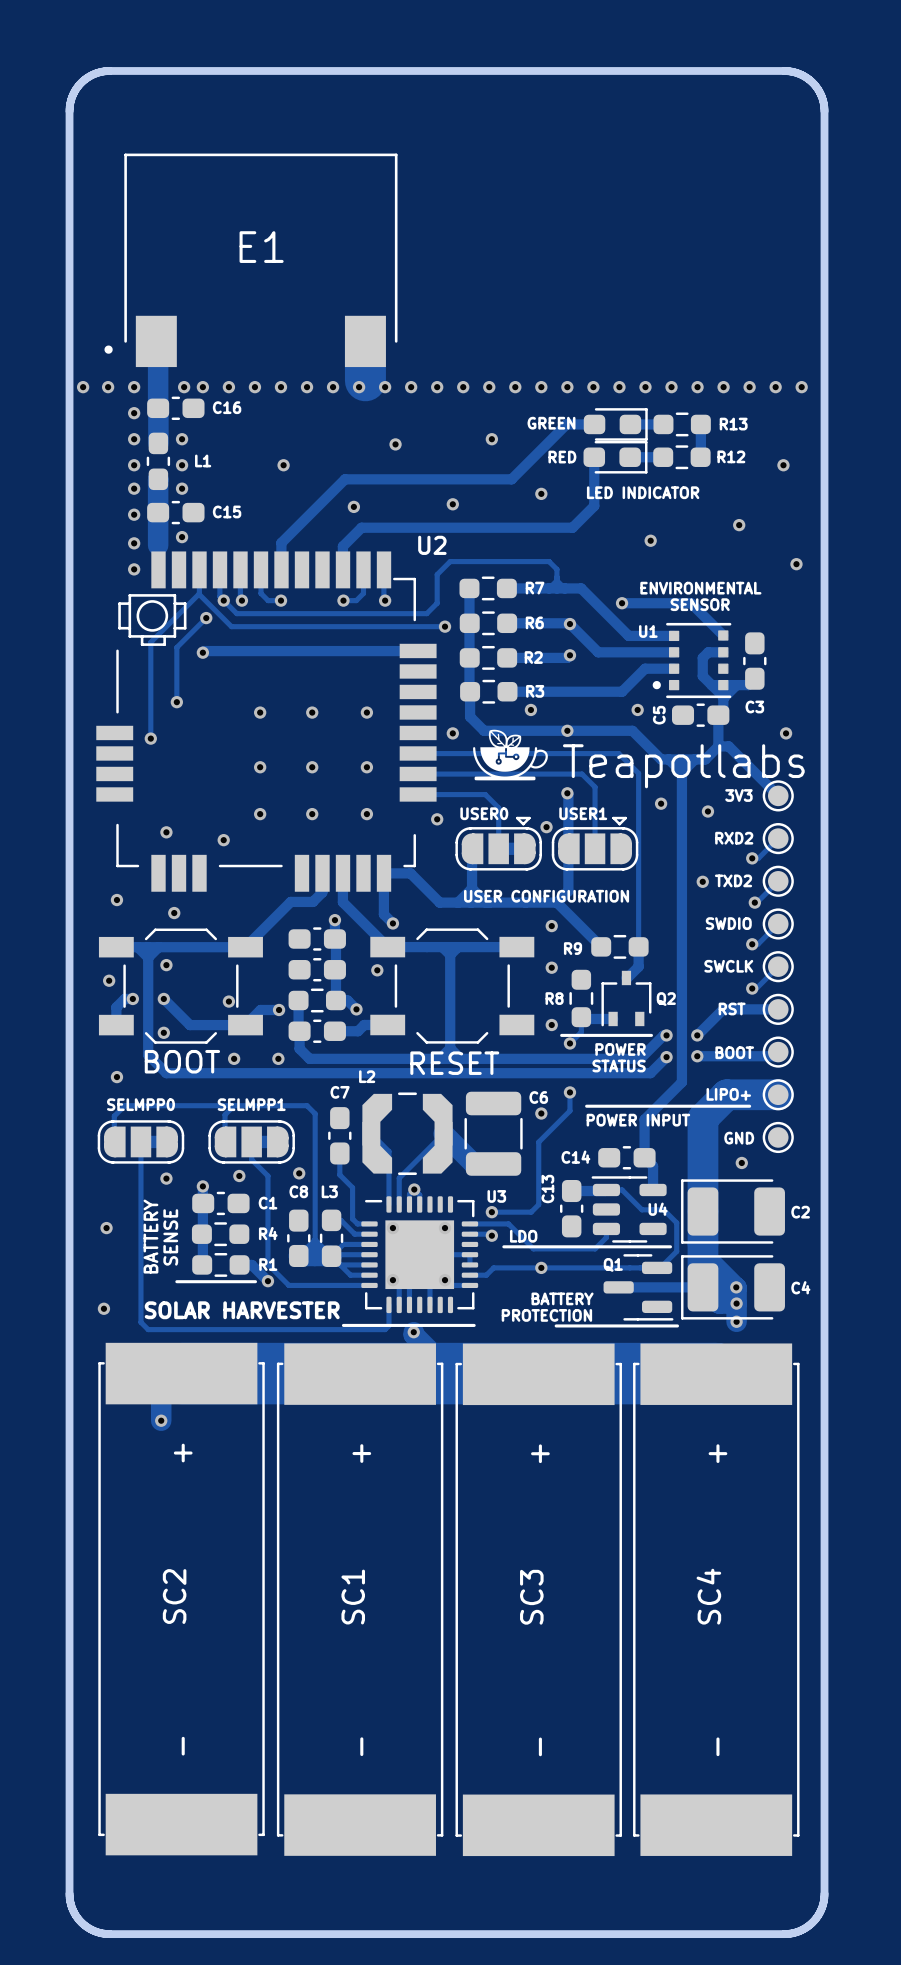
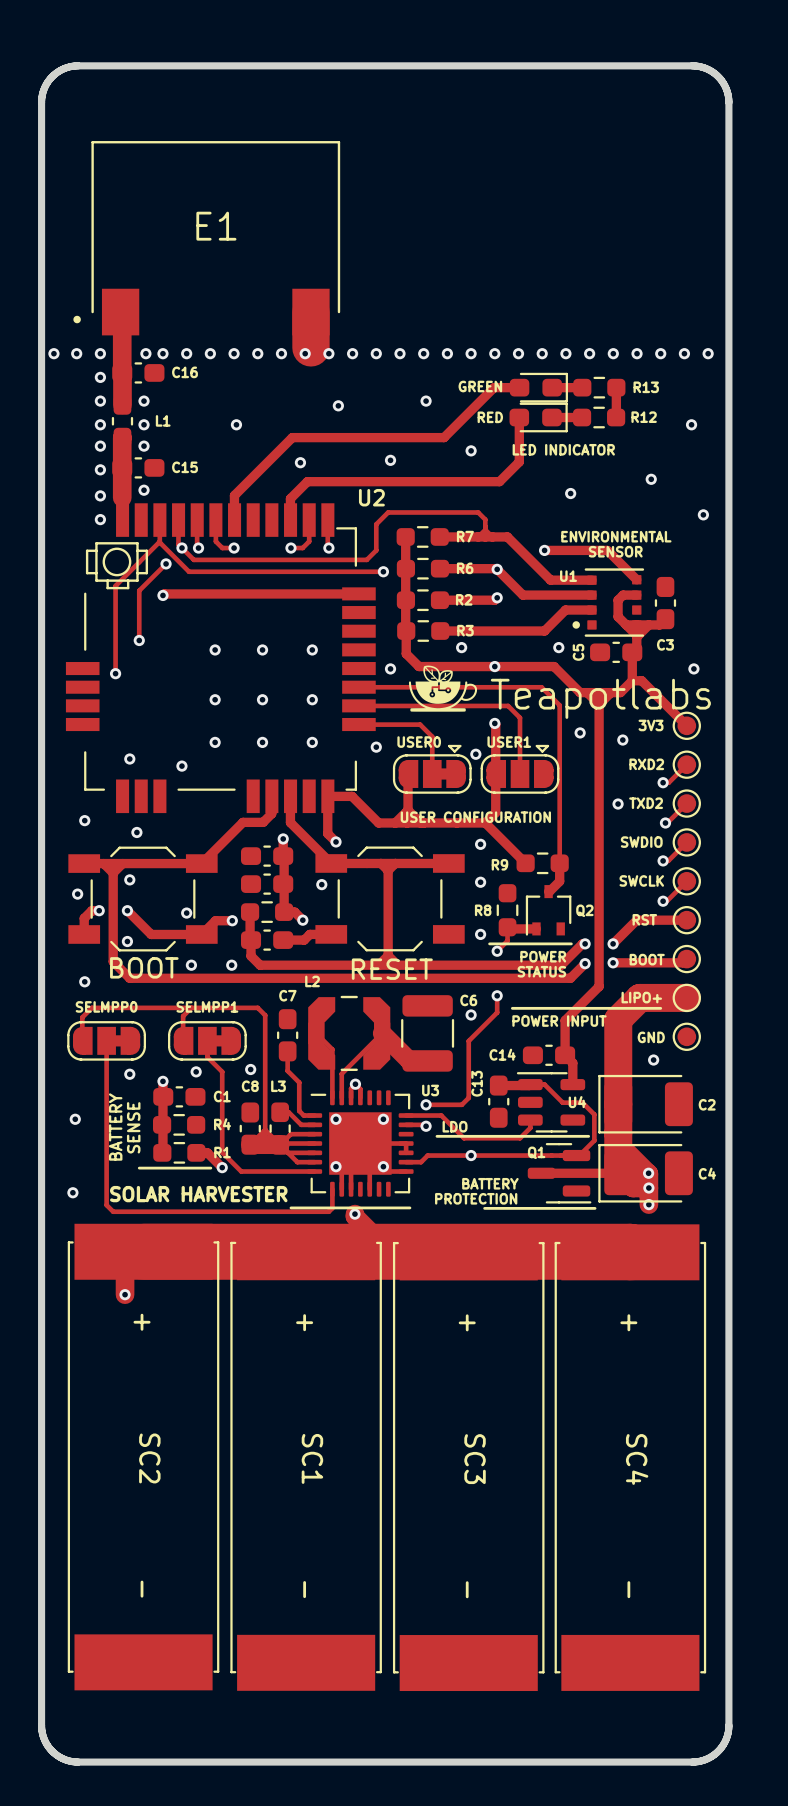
SC2 text rotation: 0° (183, 1453) -> 180° (142, 1322)
SC1 text rotation: 0° (361, 1453) -> 180° (304, 1322)
SC3 text rotation: 0° (540, 1453) -> 180° (467, 1322)
SC4 text rotation: 0° (717, 1453) -> 180° (628, 1322)
SC2 name rotation: 0° (174, 1596) -> 180° (149, 1458)
SC4 name rotation: 0° (708, 1596) -> 180° (637, 1459)
SC1 name rotation: 0° (353, 1597) -> 180° (312, 1458)
SC3 name rotation: 0° (531, 1597) -> 180° (475, 1459)
SC2 text rotation: 0° (183, 1746) -> 180° (142, 1589)
SC1 text rotation: 0° (361, 1746) -> 180° (304, 1589)
SC3 text rotation: 0° (540, 1746) -> 180° (467, 1589)
SC4 text rotation: 0° (717, 1746) -> 180° (628, 1589)

